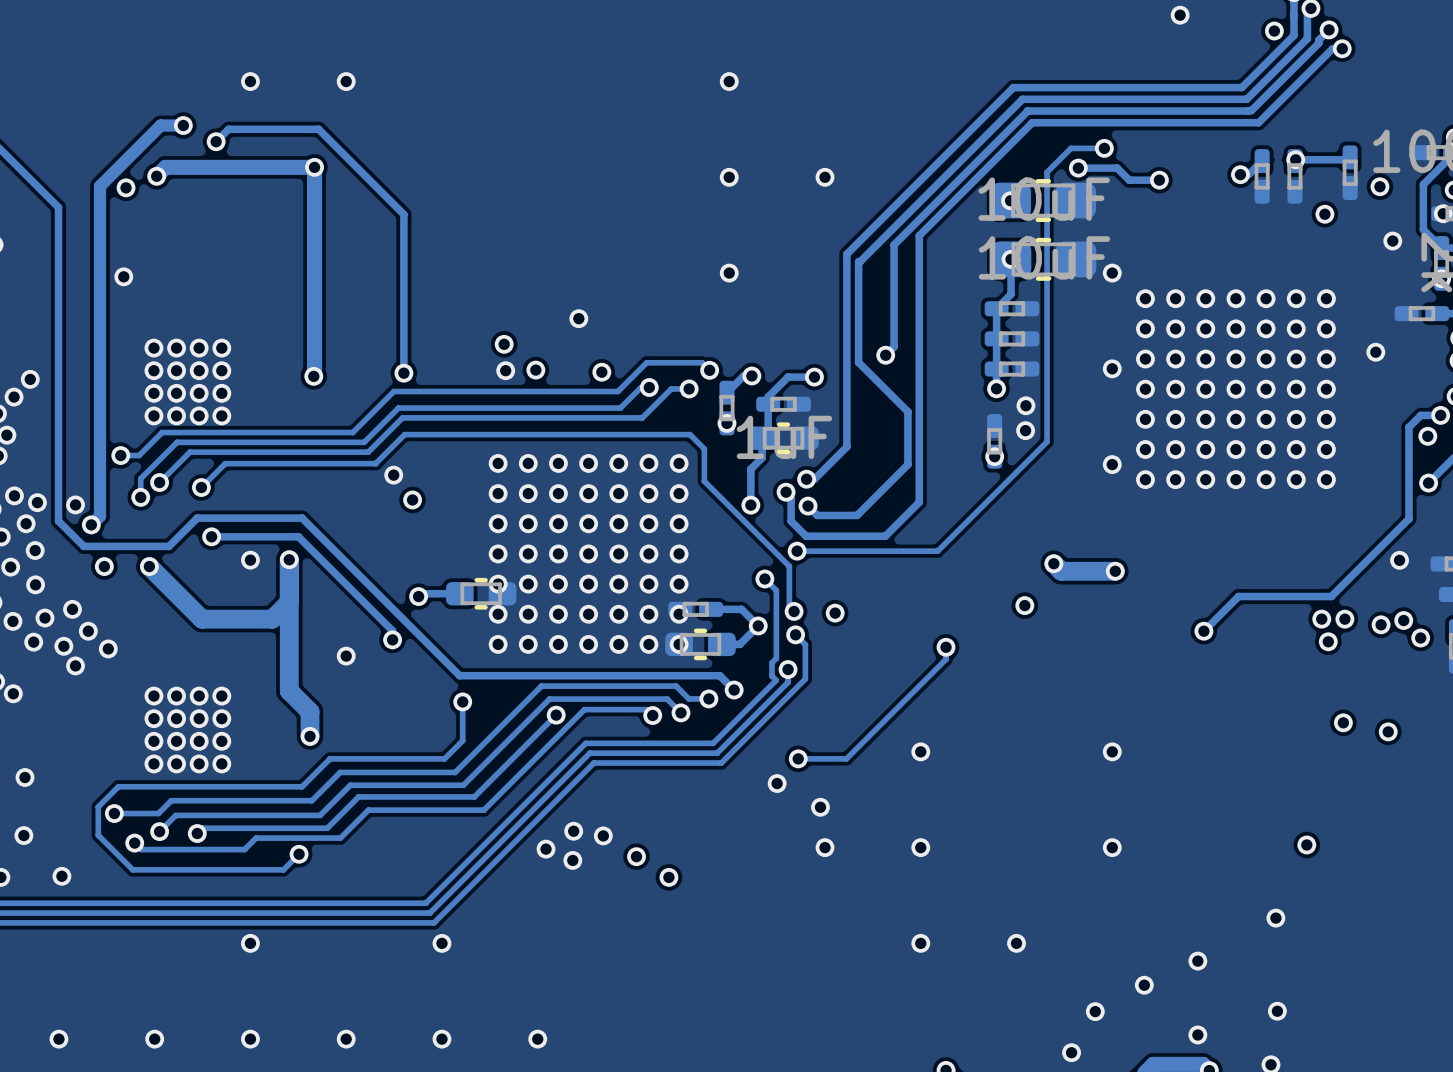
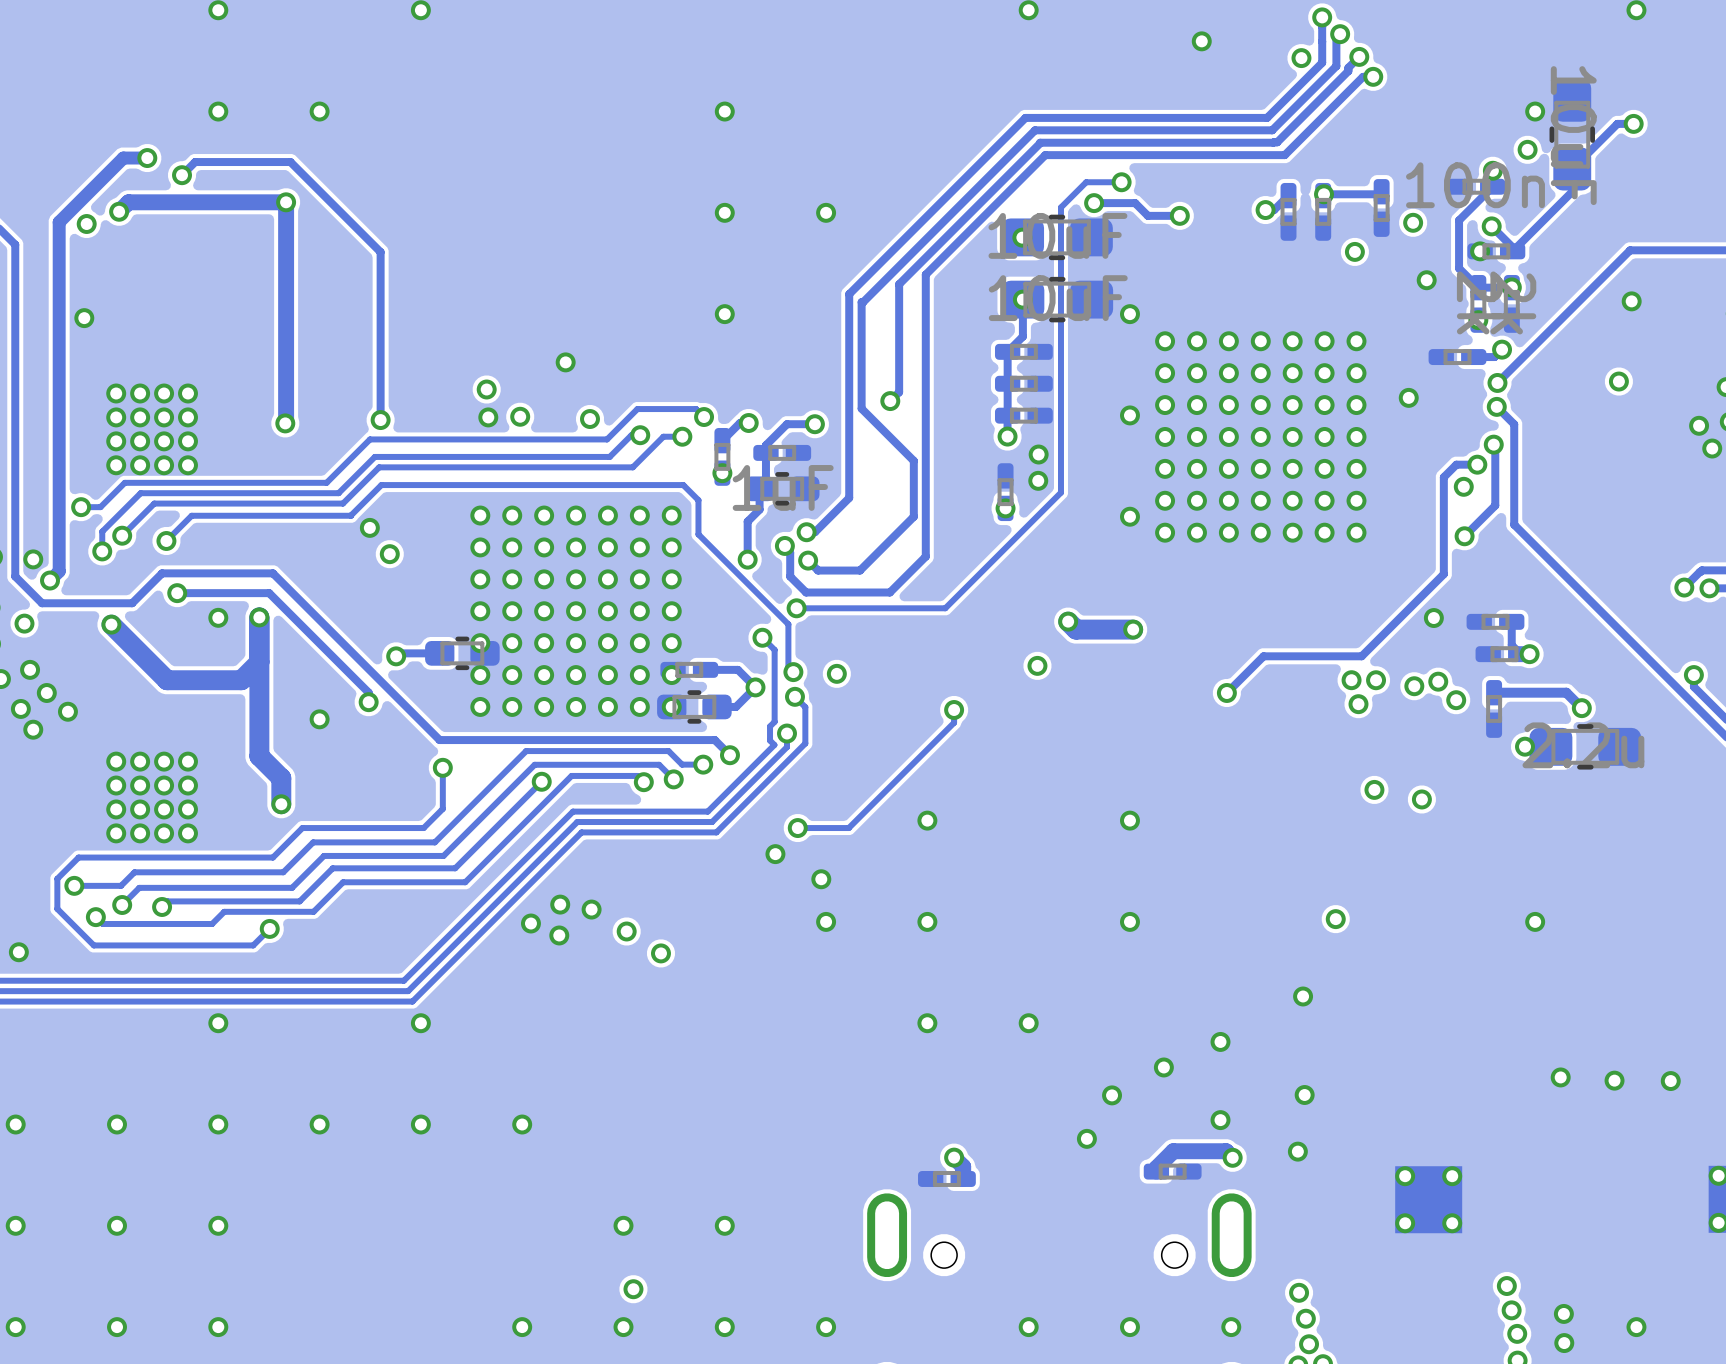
via position: (104, 566) -> (24, 623)

